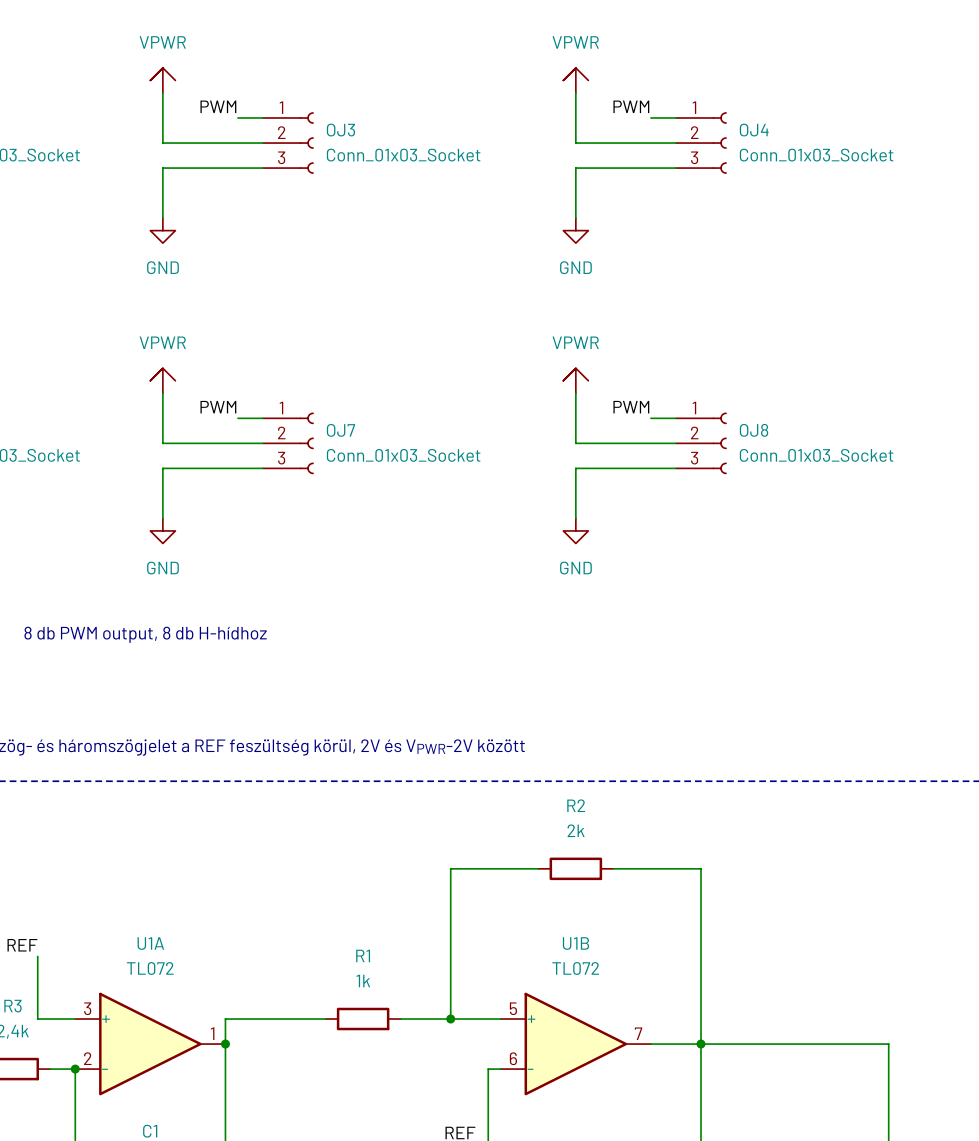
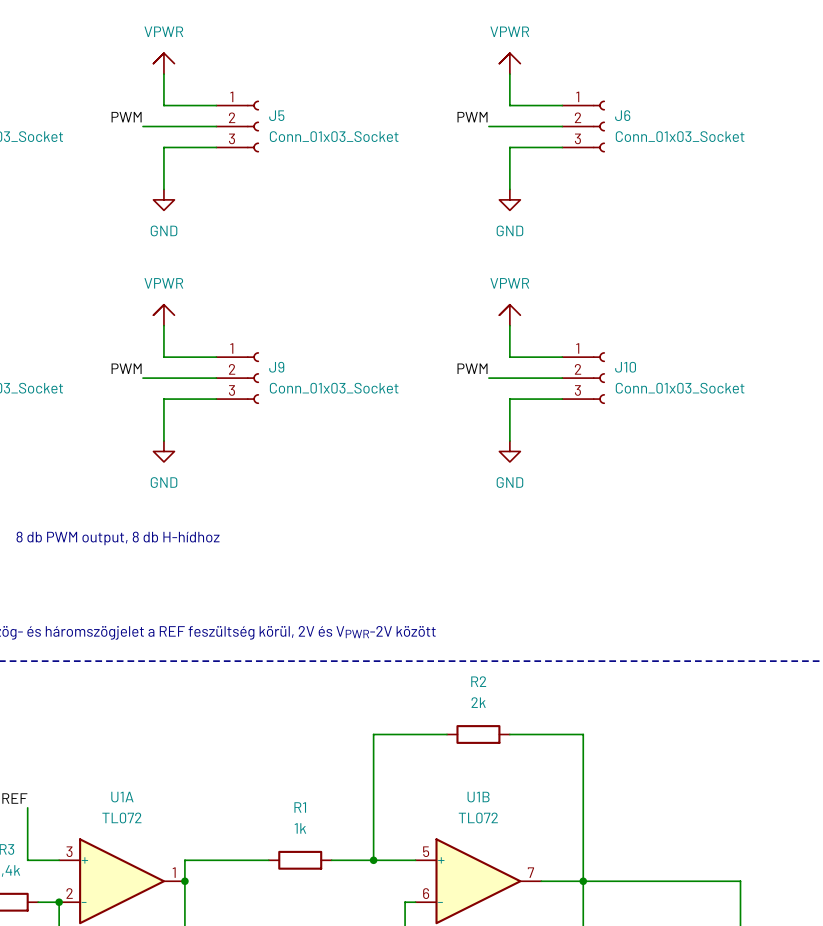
power symbol position: VPWR (162, 80) -> VPWR (163, 63)
wire: none -> (163, 74) (163, 105) (195, 105)
power symbol position: VPWR (575, 80) -> VPWR (509, 63)
wire: none -> (509, 74) (509, 105) (541, 105)
wire: (162, 92) (162, 143) (175, 143) -> none
wire: (575, 92) (575, 143) (588, 143) -> none
label position: PWM (218, 106) -> PWM (126, 117)
label position: PWM (631, 106) -> PWM (472, 117)
OJ3 name: OJ3 (340, 130) -> J5 (276, 115)
OJ4 name: OJ4 (754, 130) -> J6 (622, 115)
wire: (200, 168) (162, 168) (162, 218) -> (163, 147) (163, 189)
wire: (613, 168) (575, 168) (575, 218) -> (509, 147) (509, 189)
power symbol position: GND (162, 230) -> GND (163, 199)
power symbol position: GND (575, 230) -> GND (509, 199)
power symbol position: VPWR (162, 380) -> VPWR (163, 315)
wire: none -> (163, 325) (163, 357) (195, 357)
power symbol position: VPWR (575, 380) -> VPWR (509, 315)
wire: none -> (509, 325) (509, 357) (541, 357)
wire: (162, 393) (162, 443) (175, 443) -> none
wire: (575, 393) (575, 443) (588, 443) -> none
label position: PWM (218, 407) -> PWM (126, 368)
label position: PWM (631, 407) -> PWM (472, 368)
OJ7 name: OJ7 (340, 430) -> J9 (276, 367)
OJ8 name: OJ8 (754, 430) -> J10 (625, 367)
wire: (200, 468) (162, 468) (162, 518) -> (163, 399) (163, 440)
wire: (613, 468) (575, 468) (575, 518) -> (509, 399) (509, 440)
power symbol position: GND (162, 530) -> GND (163, 451)
power symbol position: GND (575, 530) -> GND (509, 451)

